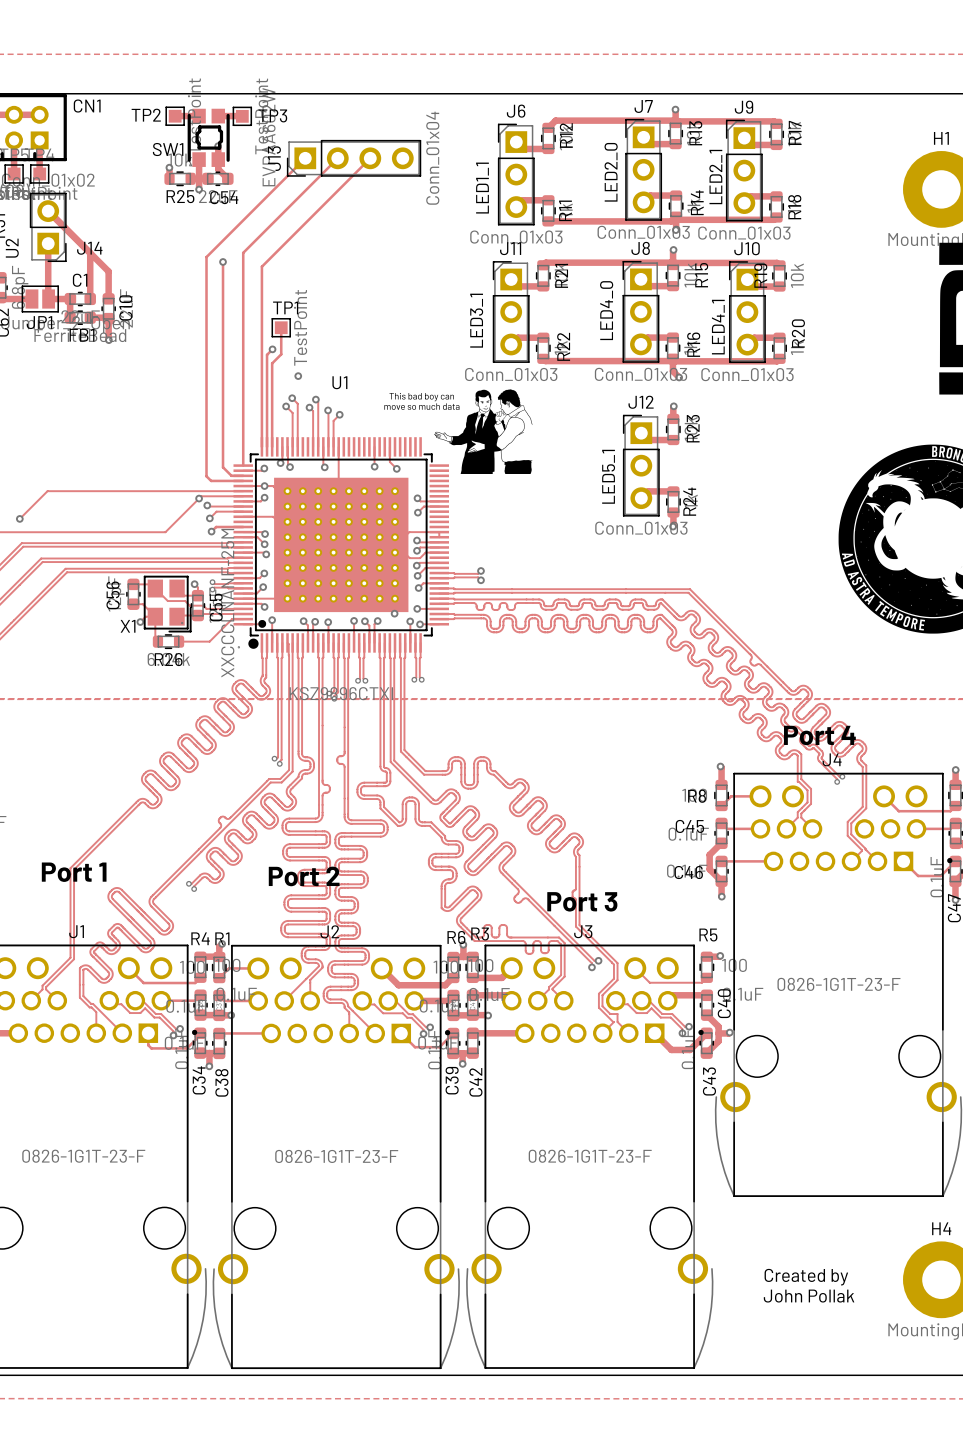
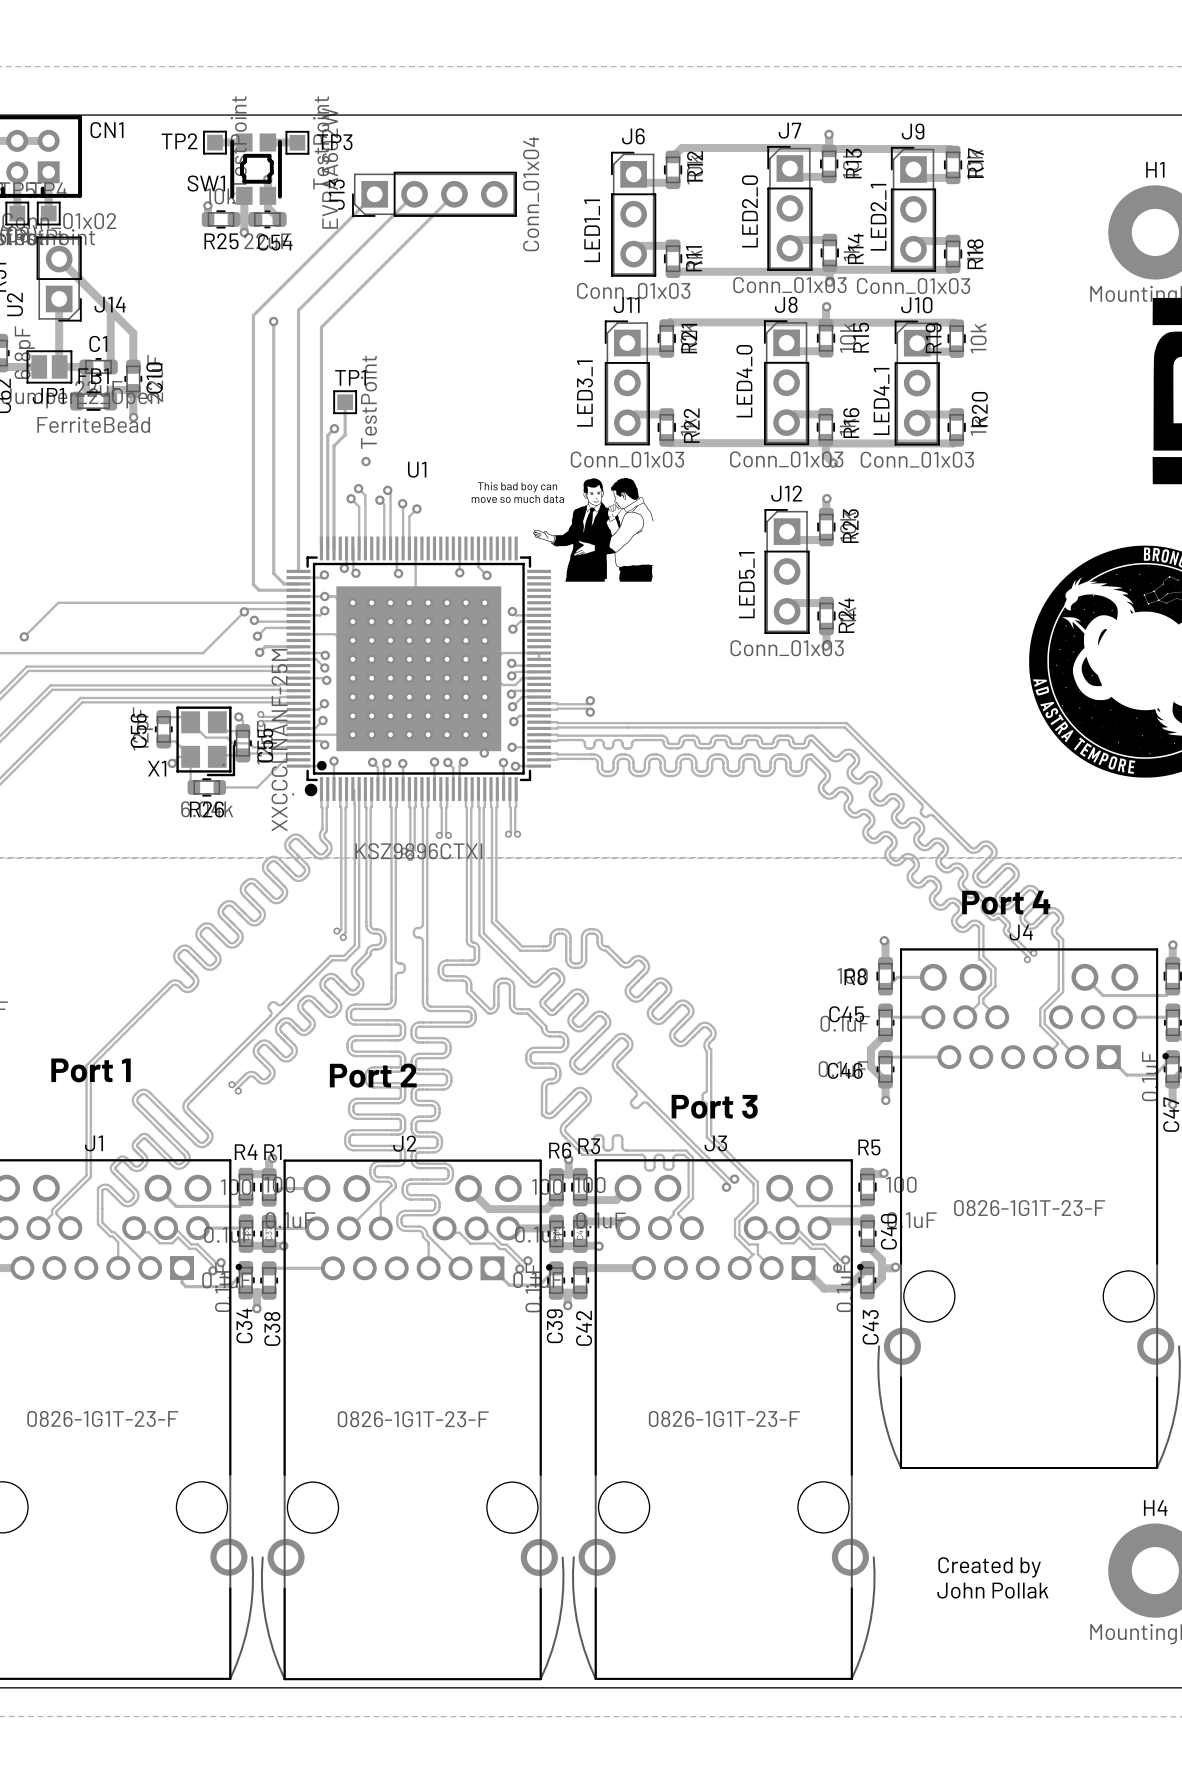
FB1 footprint: [64, 310, 96, 325] -> [70, 391, 118, 411]
FB1 name position: FB1 (82, 335) -> FB1 (93, 376)

